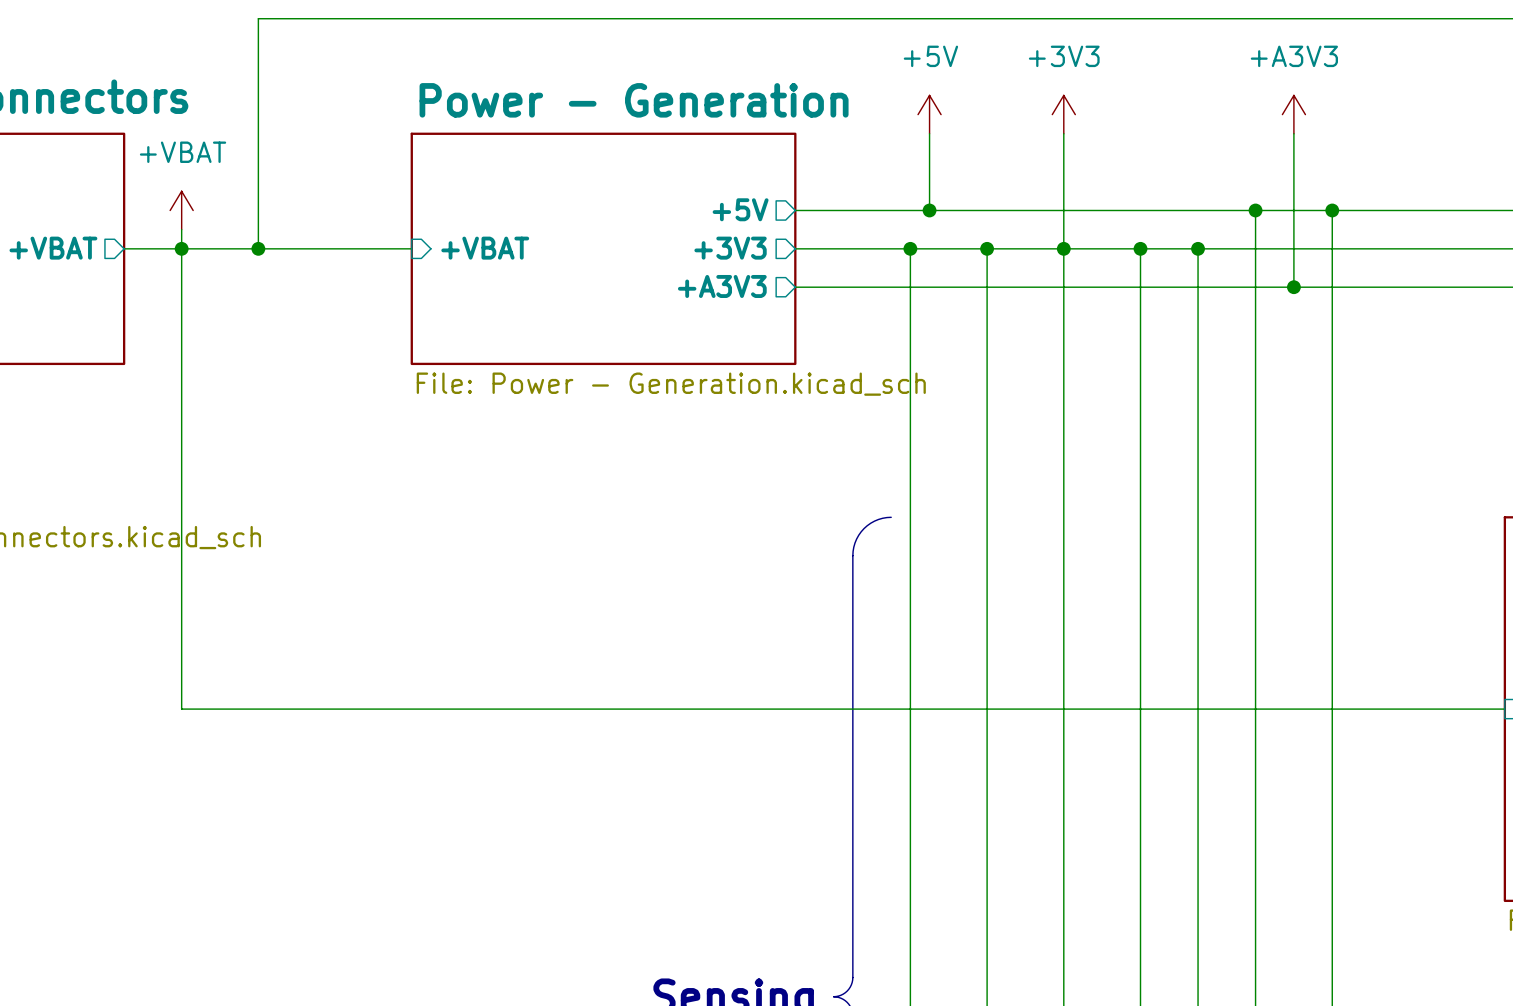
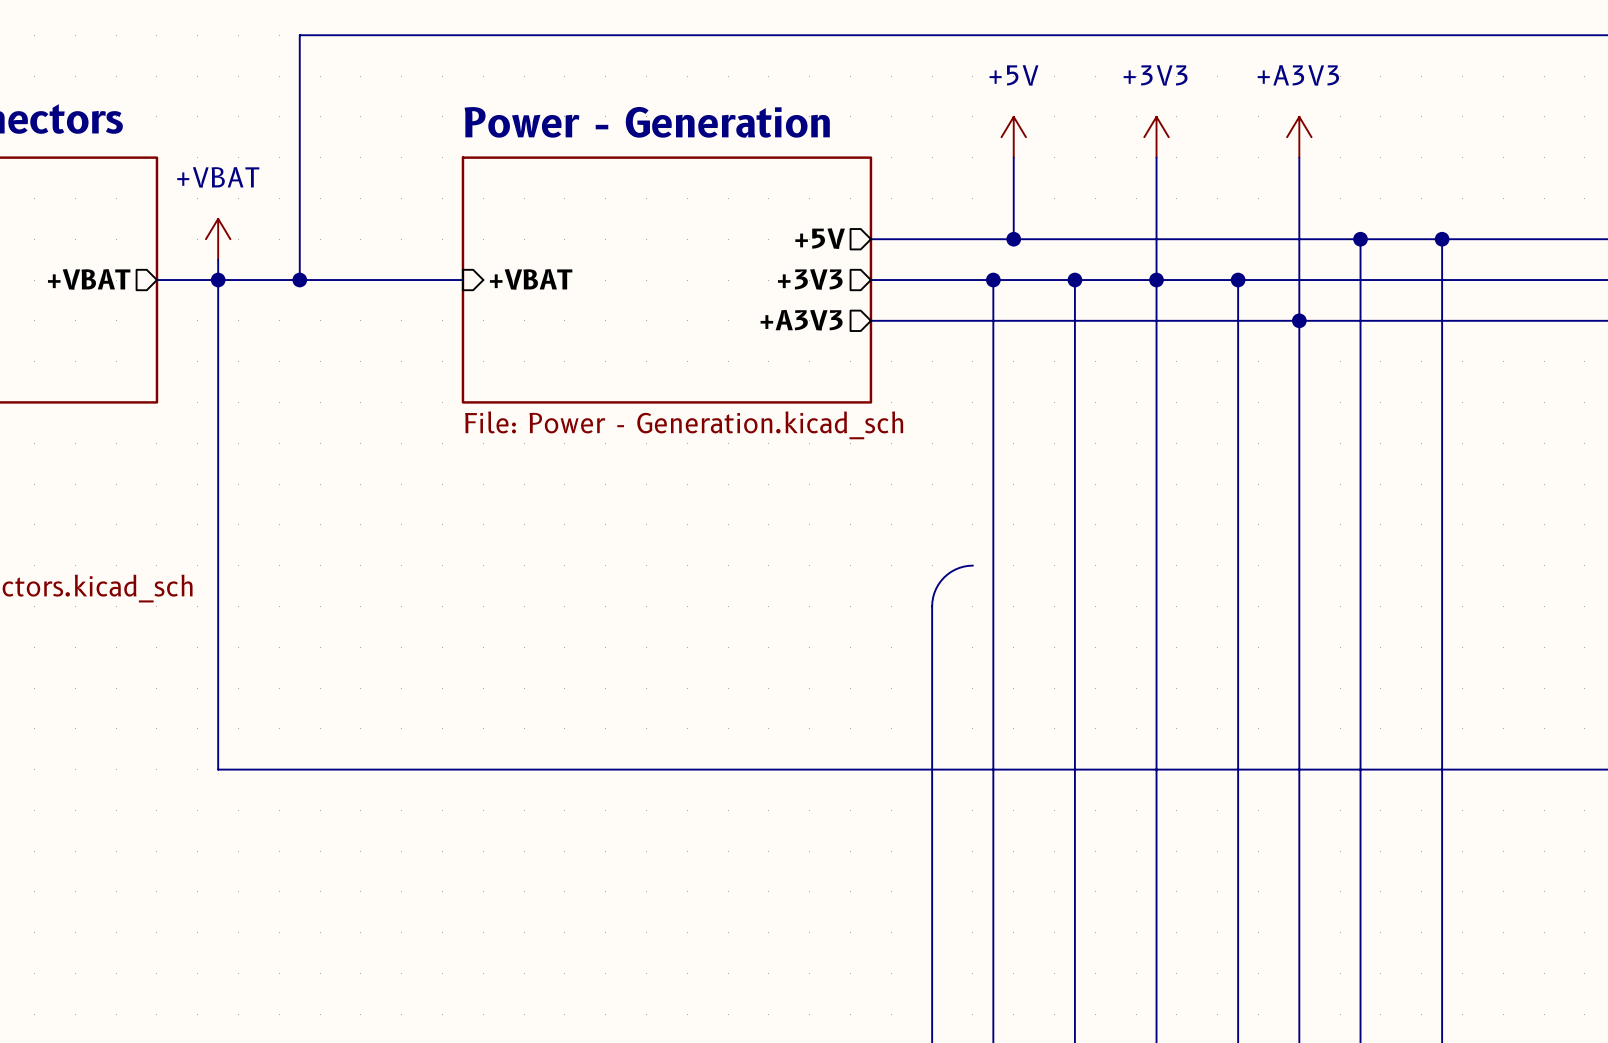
power symbol position: +A3V3 (1293, 114) -> +A3V3 (1299, 137)
wire: none -> (1299, 157) (1299, 280)
wire: (1293, 133) (1293, 287) -> none
junction position: (1198, 248) -> (1299, 320)
junction: (1293, 287) -> none

